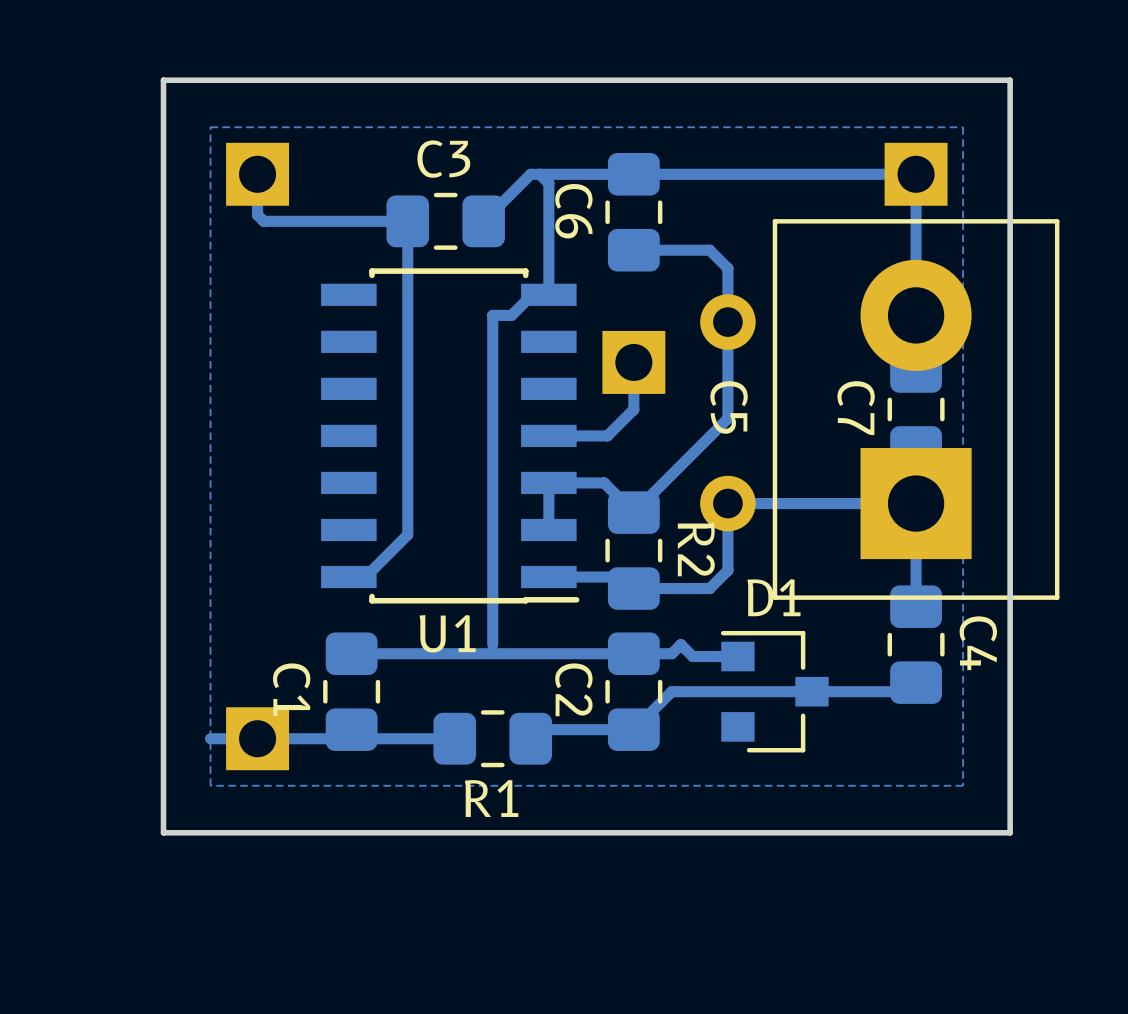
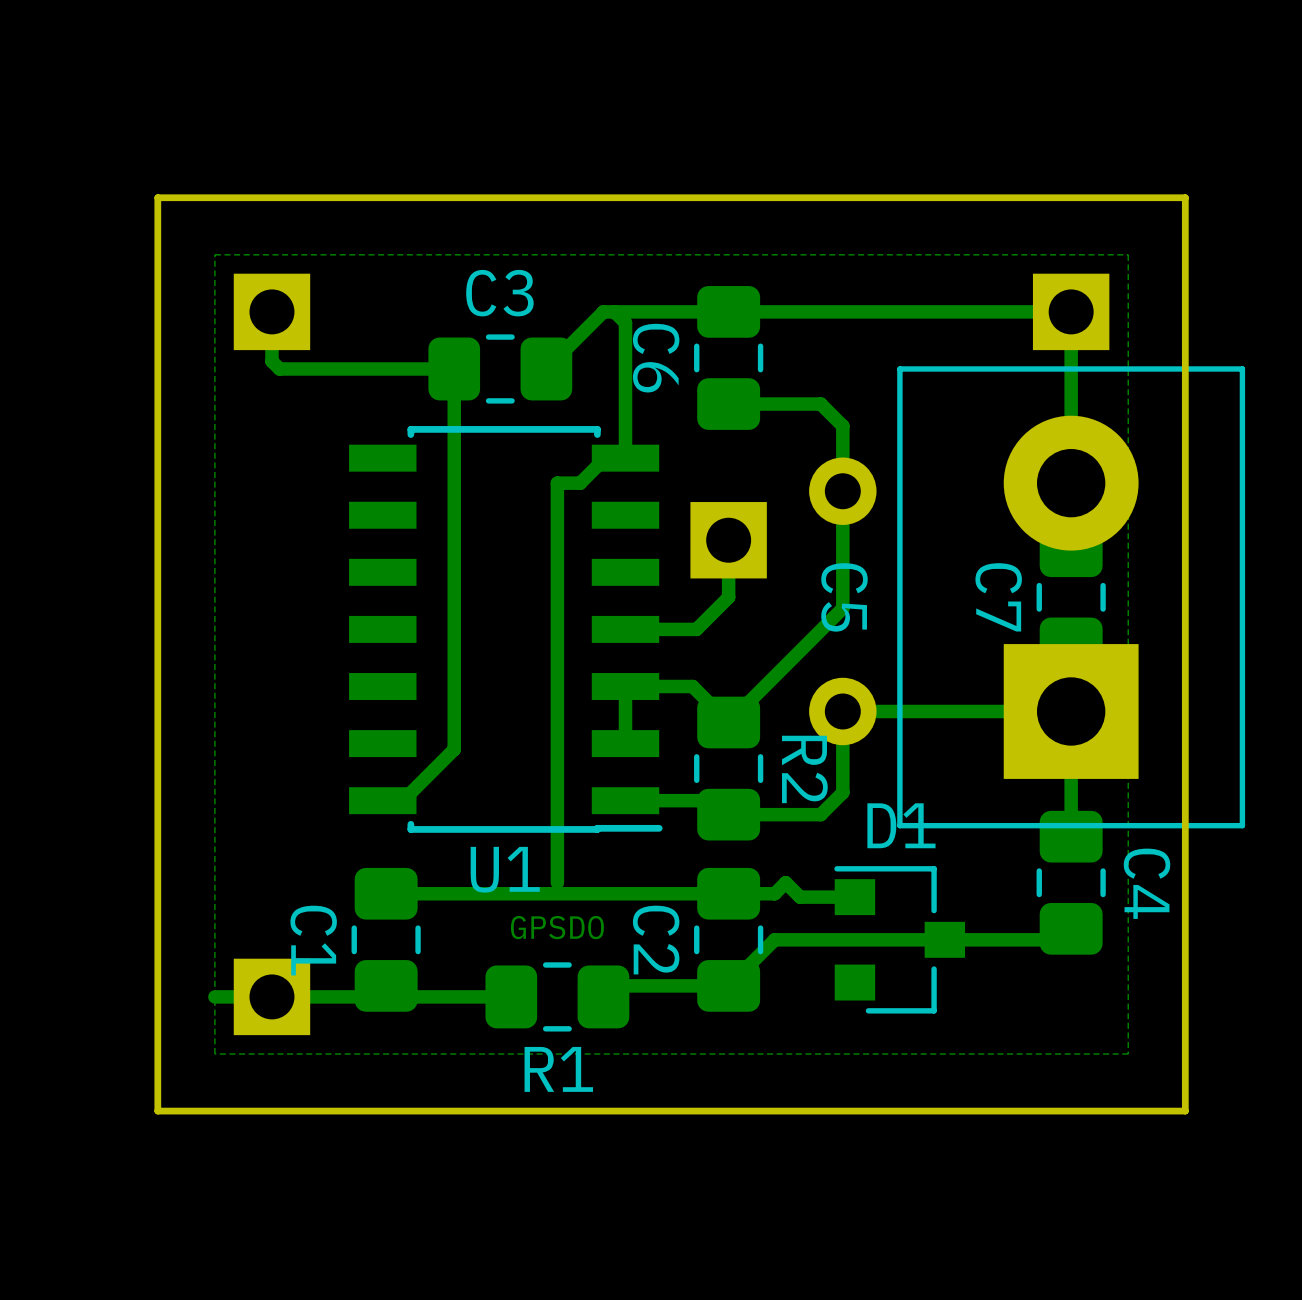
text: none -> GPSDO (557, 927)

